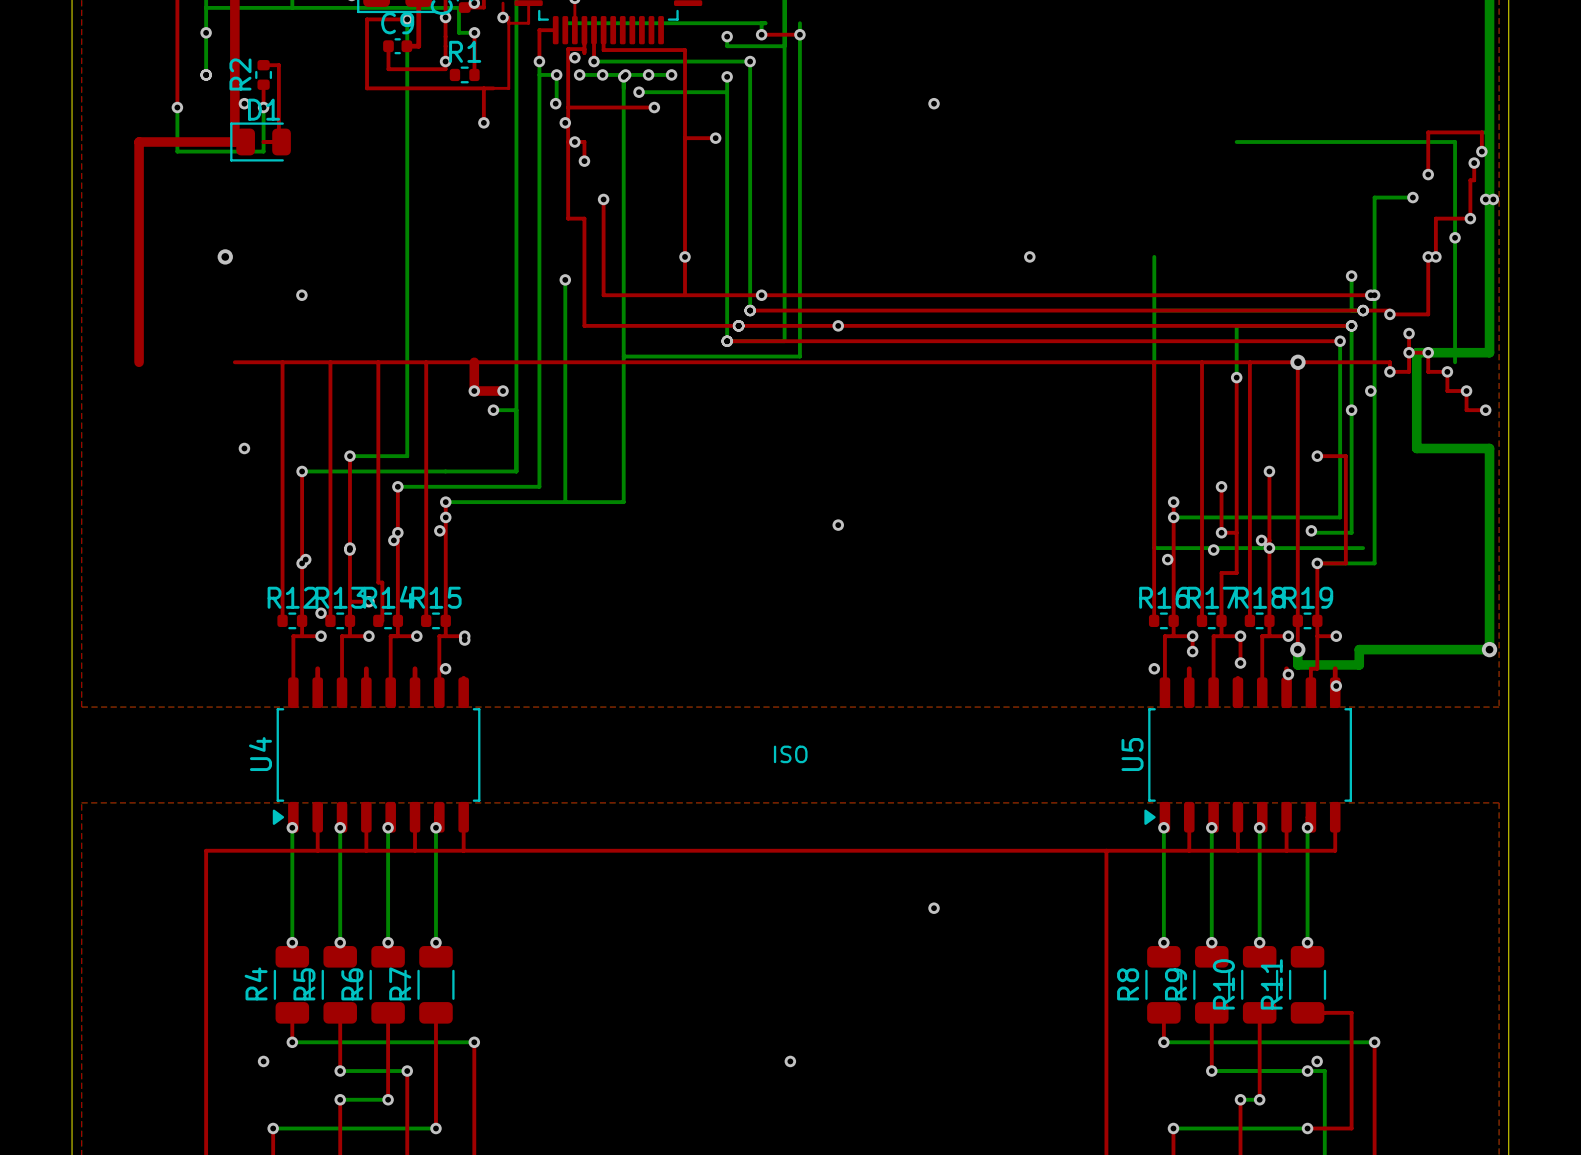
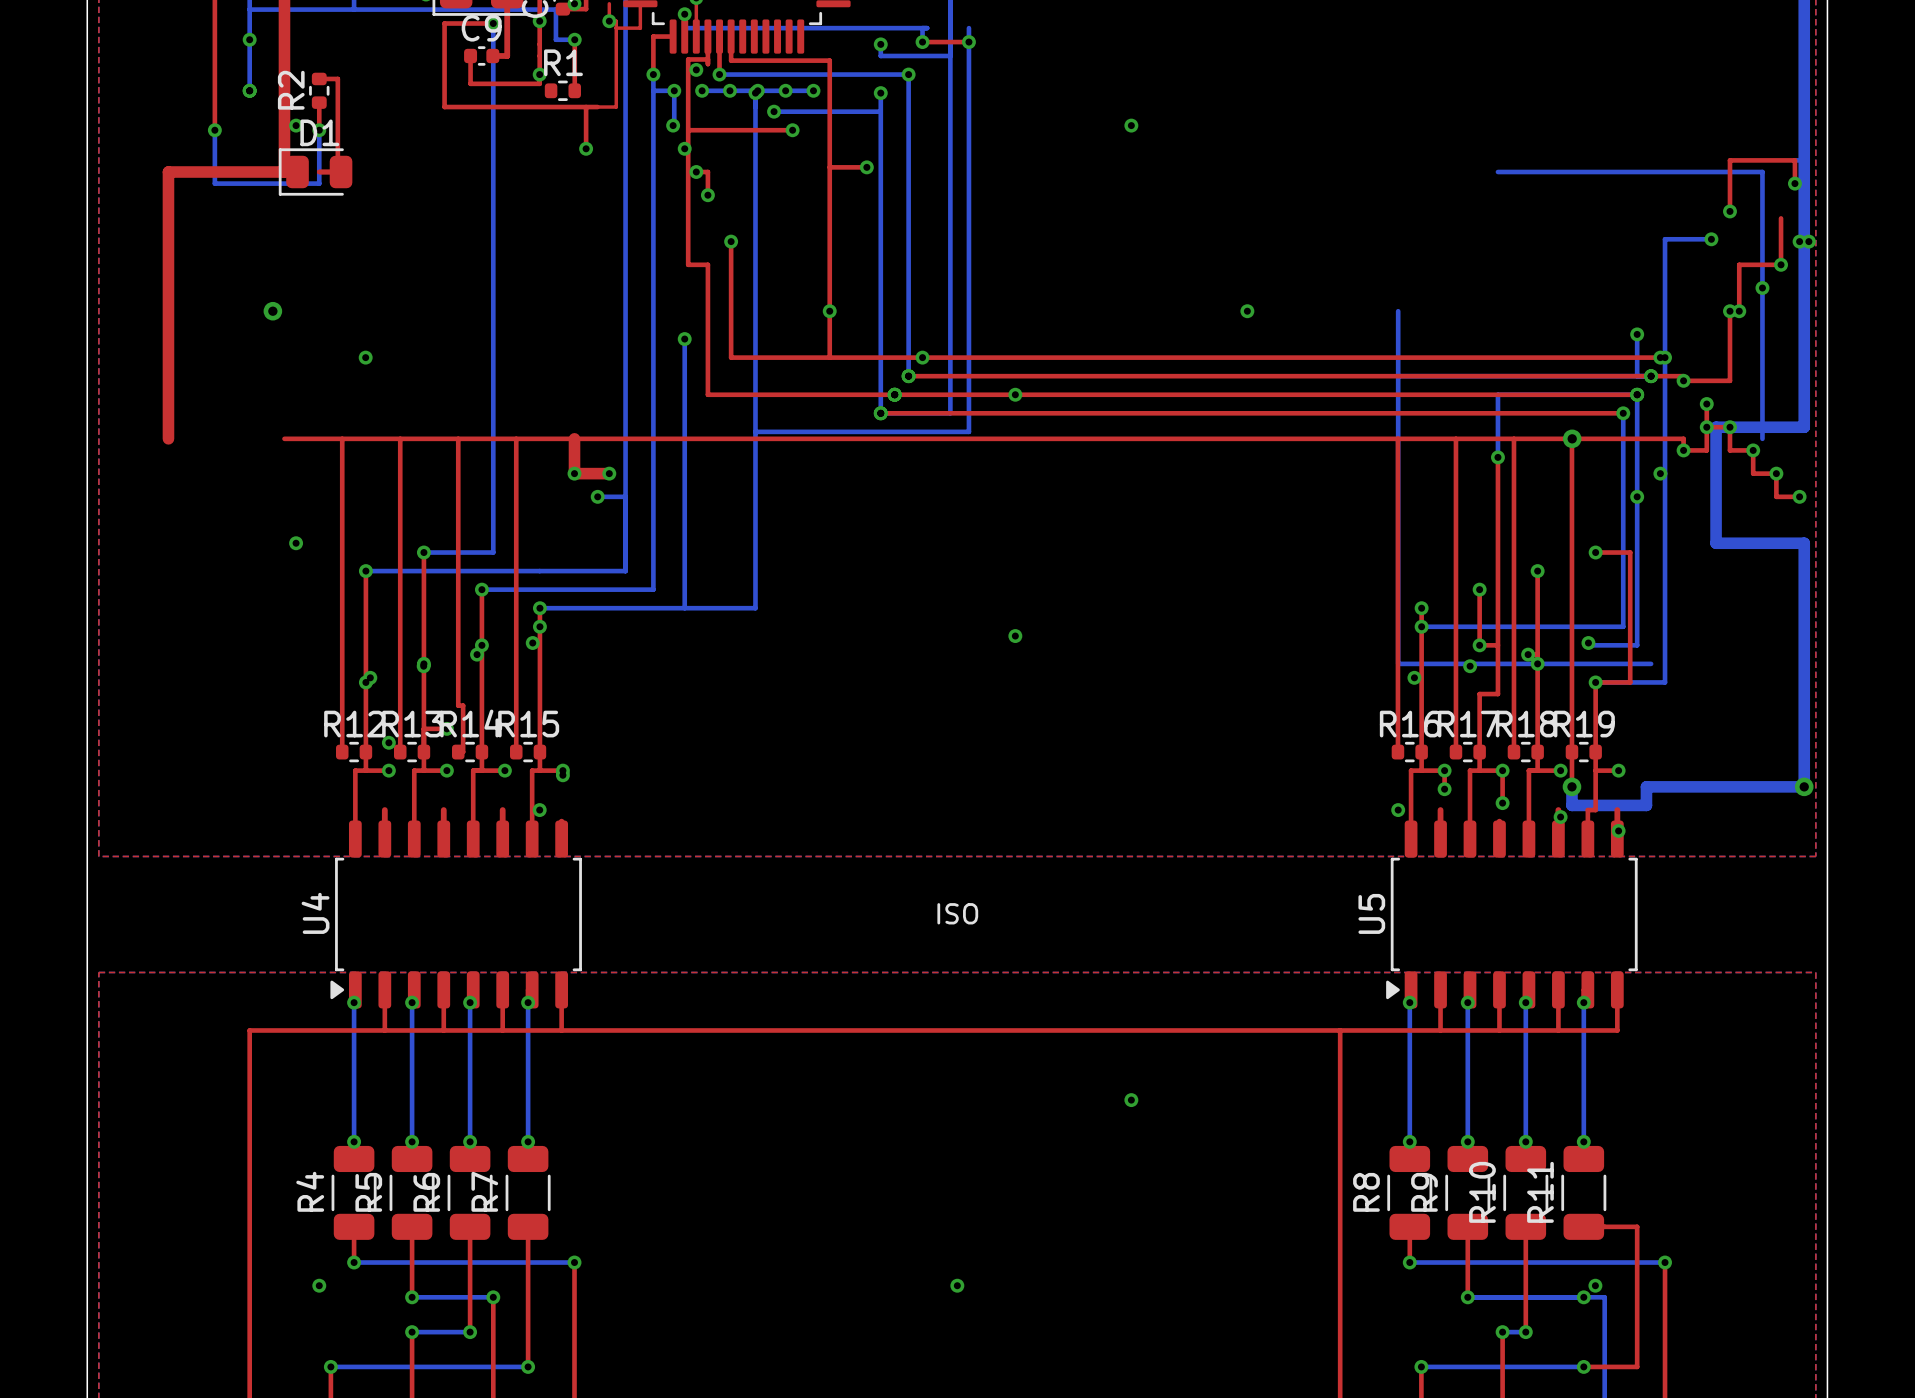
via: none -> (684, 14)
top track: (1474, 163) (1474, 180) (1470, 180) -> none
via: (1474, 163) -> none

